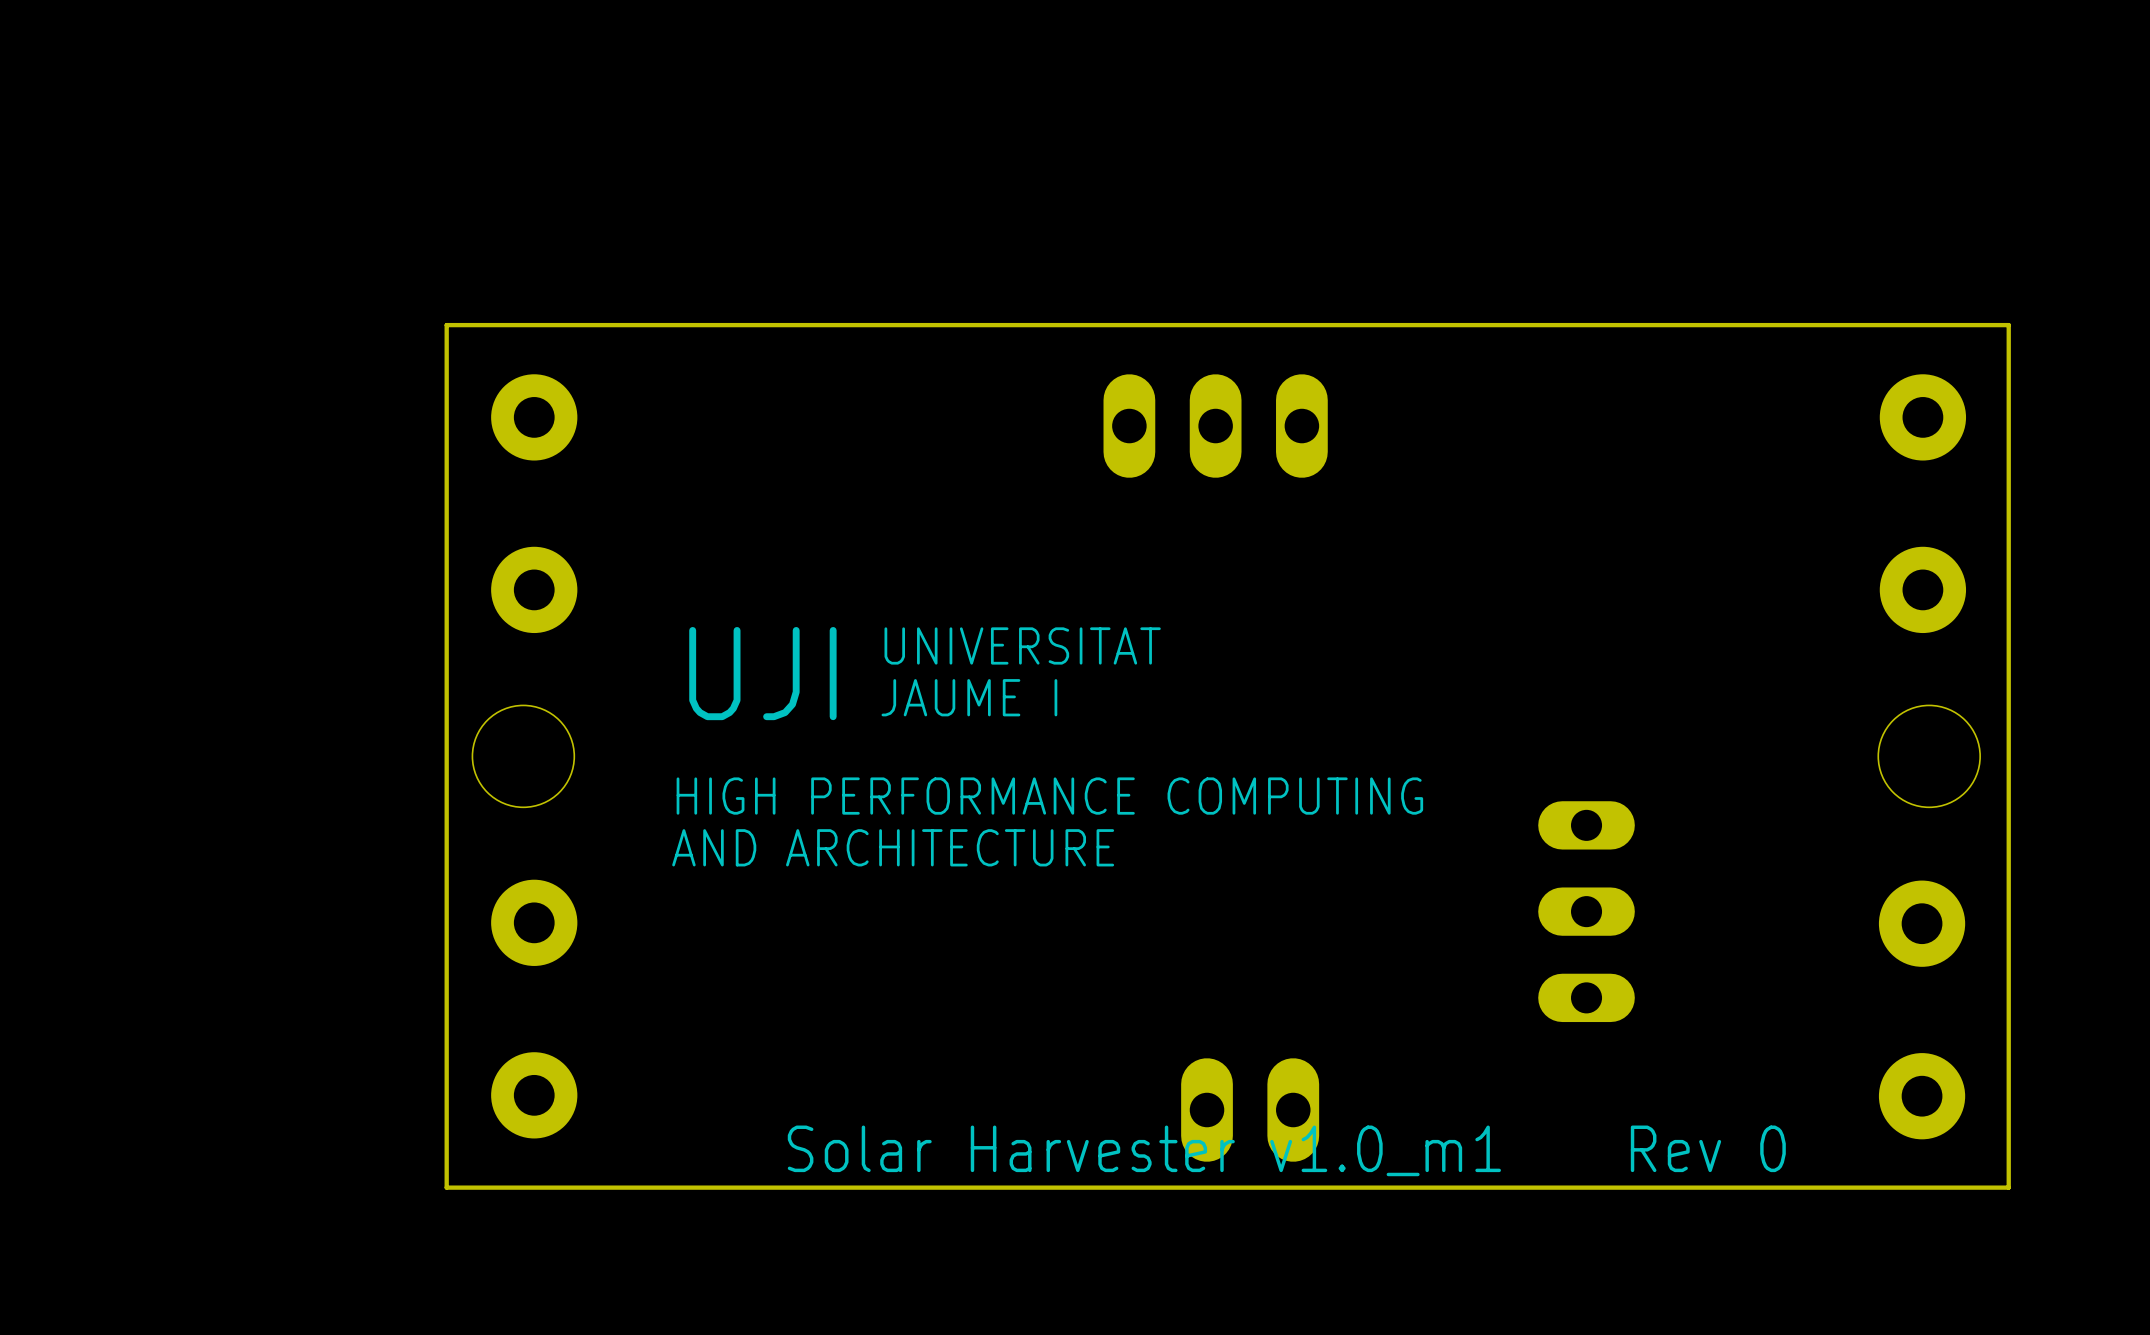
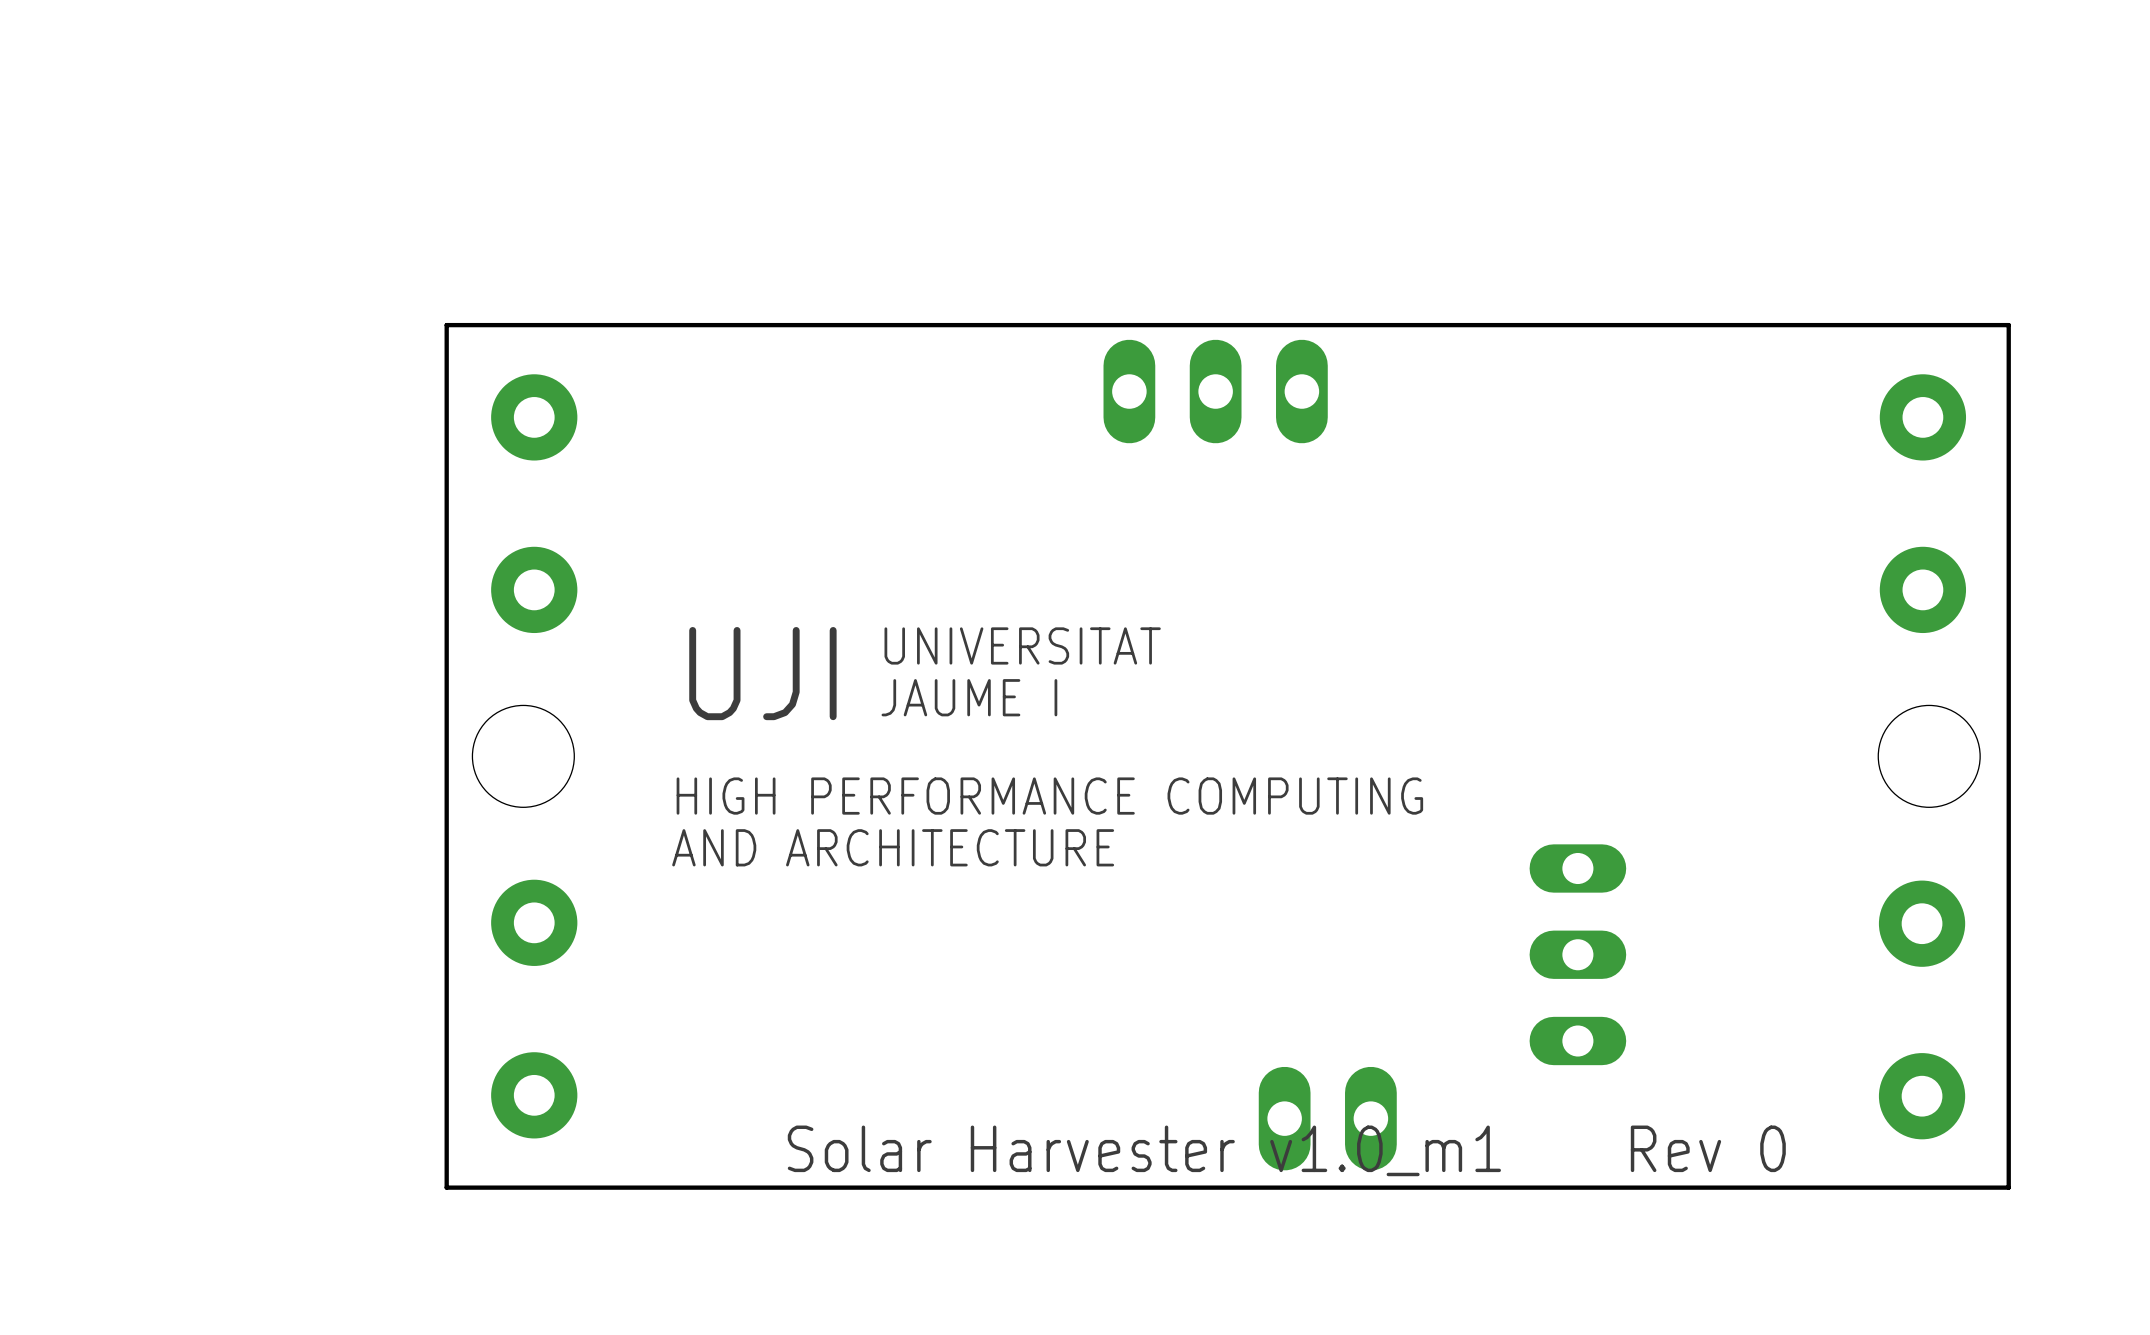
part position: (1215, 426) -> (1215, 391)
part position: (1586, 911) -> (1577, 954)
part position: (1250, 1110) -> (1327, 1118)

